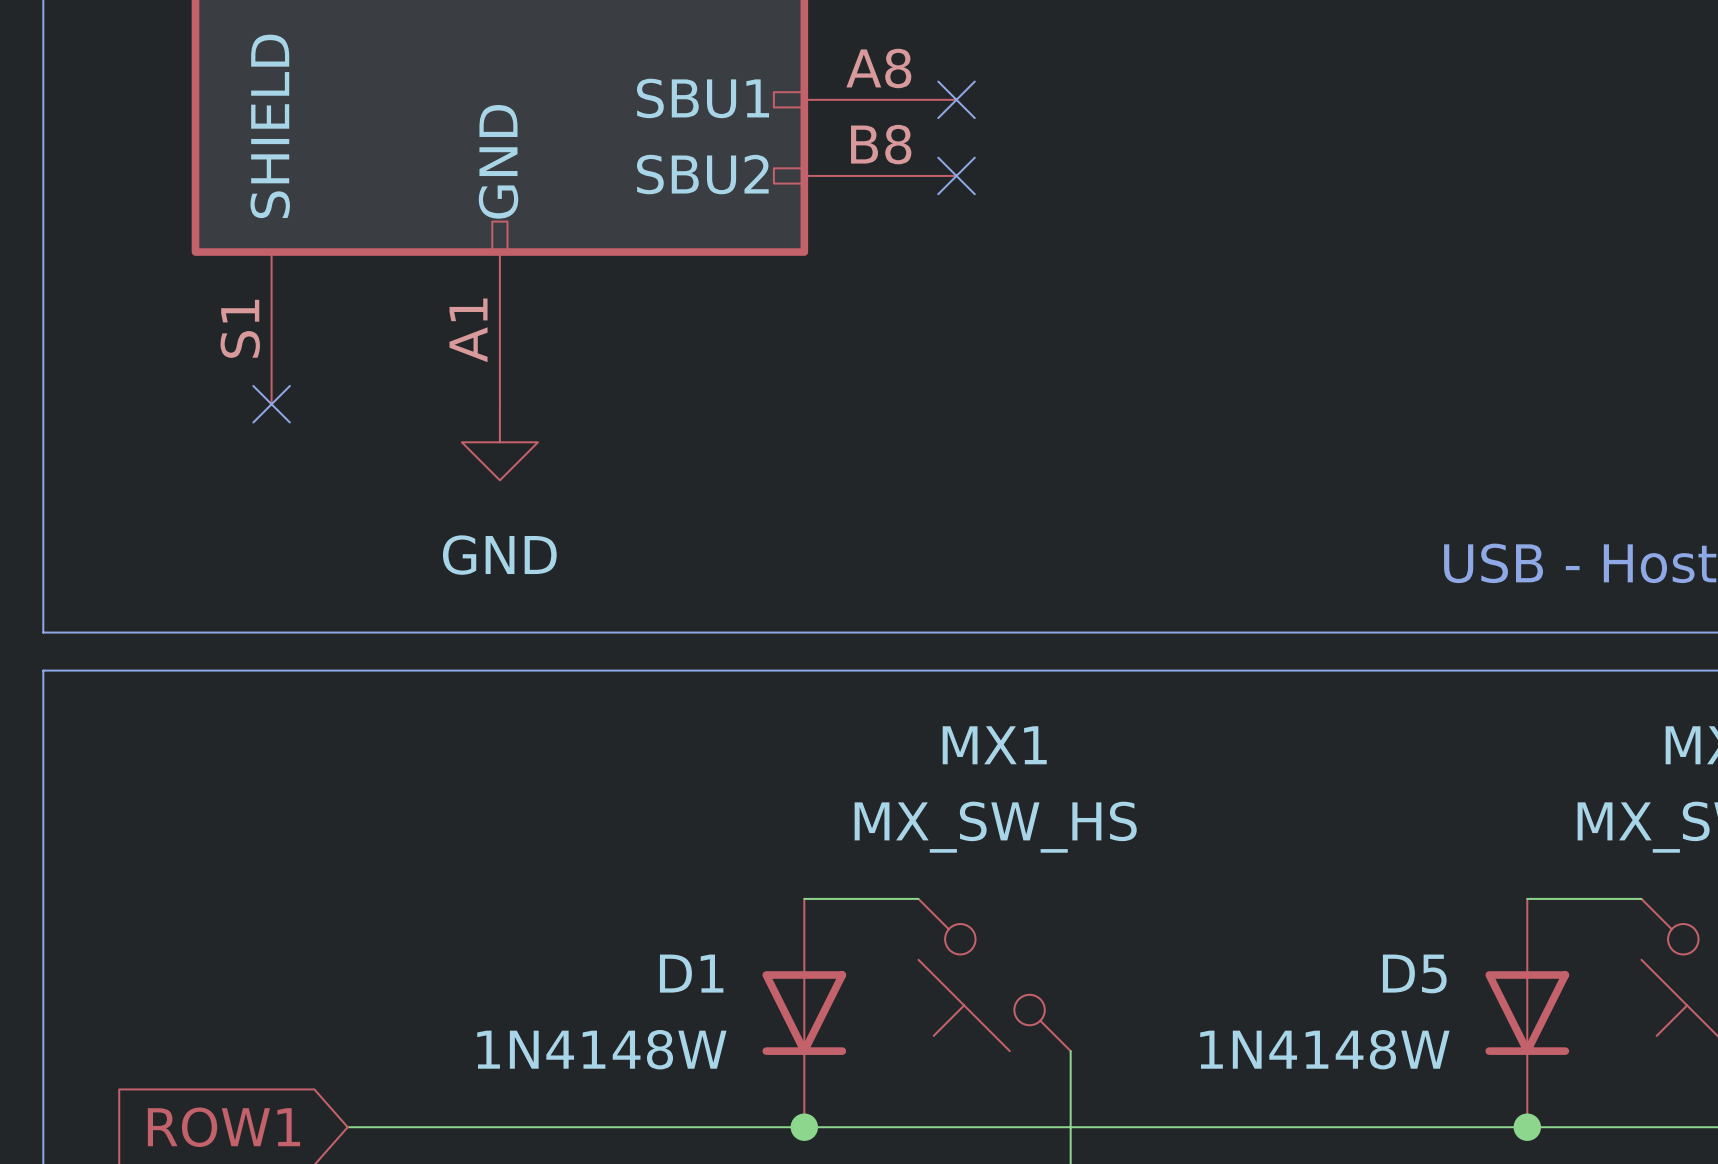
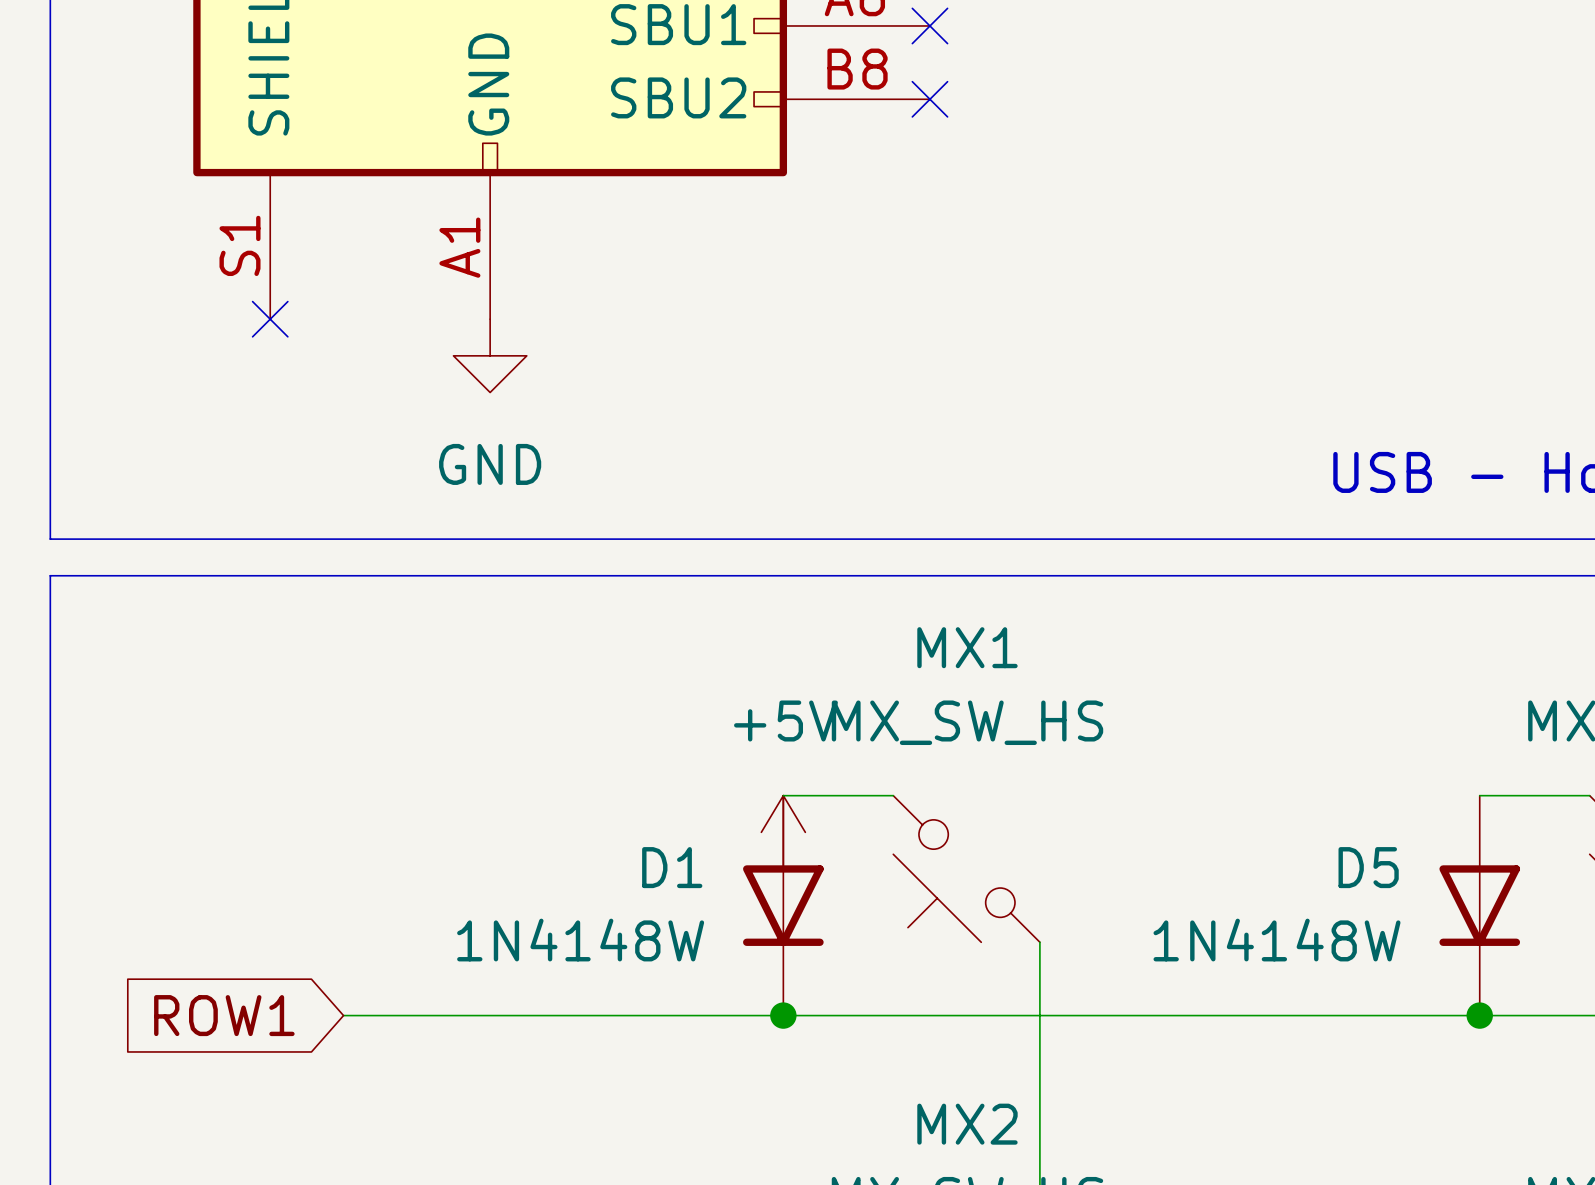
power symbol: none -> +5V (783, 832)

